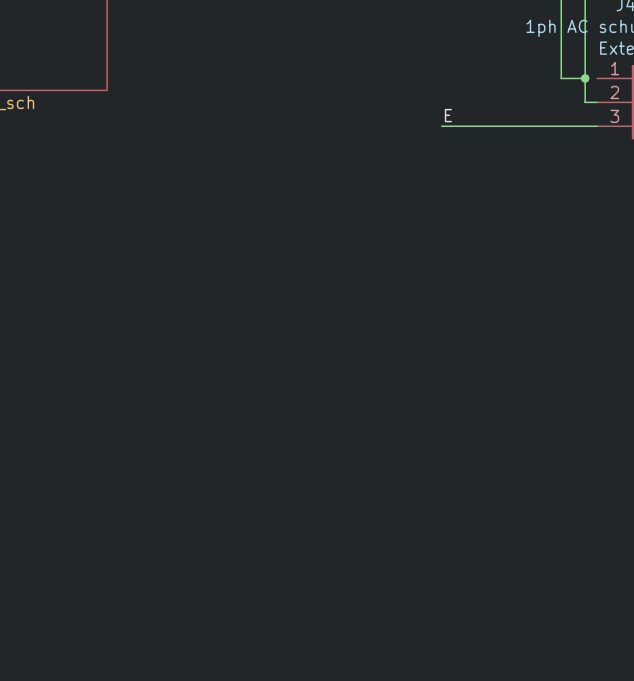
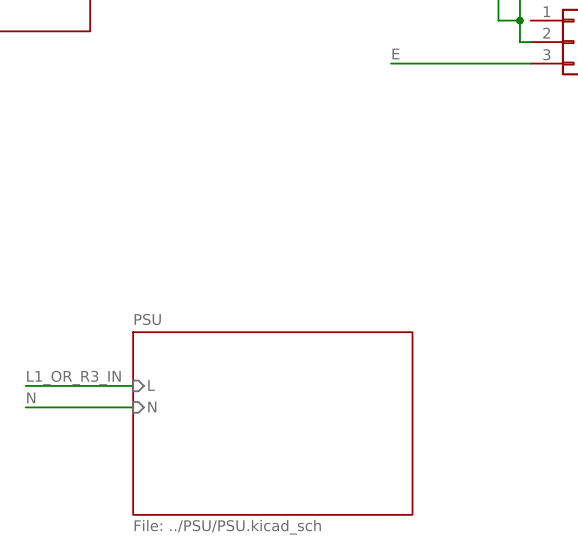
label: none -> L1_OR_R3_IN (73, 377)
wire: none -> (25, 385) (133, 385)
sheet pin: none -> L (151, 385)
label: none -> N (31, 397)
wire: none -> (25, 407) (133, 407)
sheet pin: none -> N (152, 407)
sheet PSU: none -> File: ../PSU/PSU.kicad_sch (272, 423)

